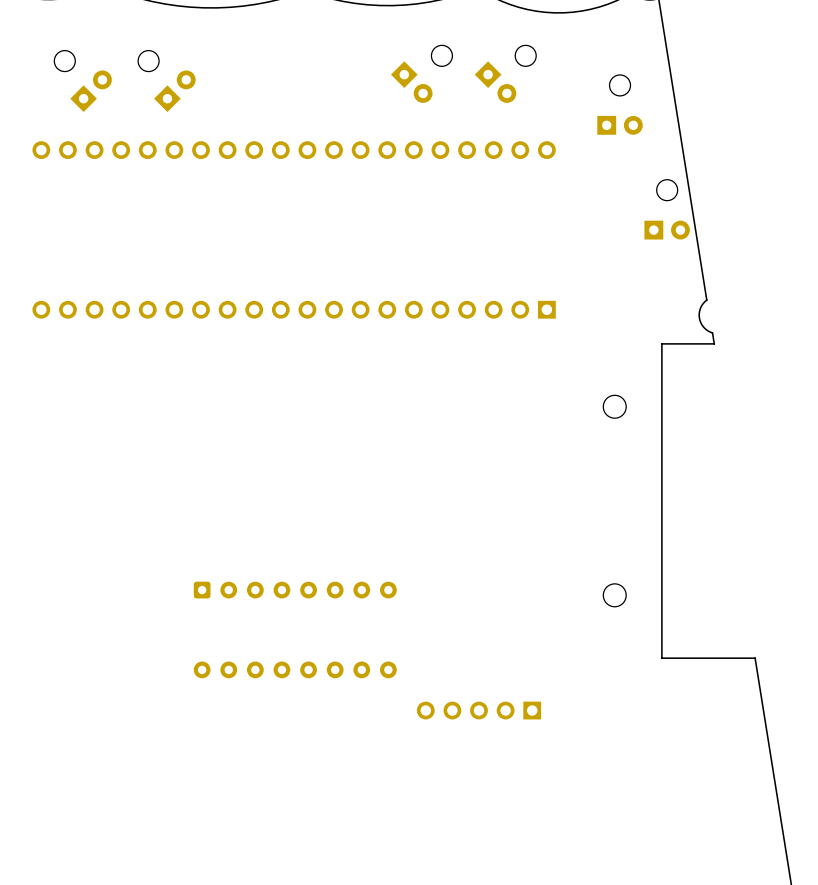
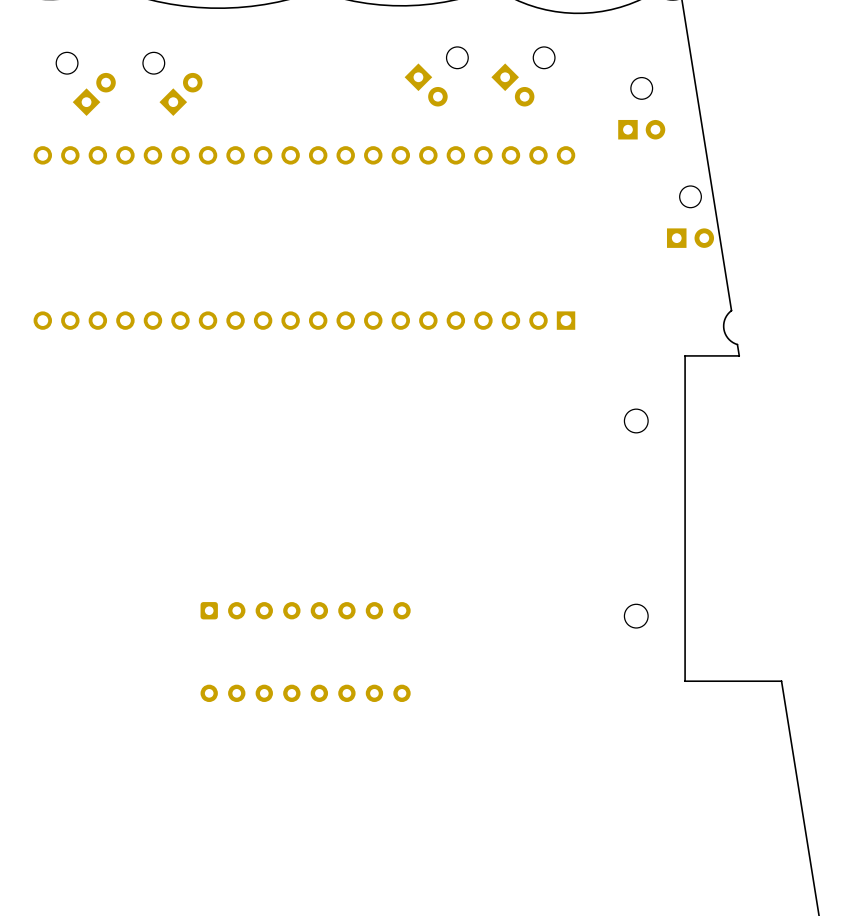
part: (479, 710) -> none

